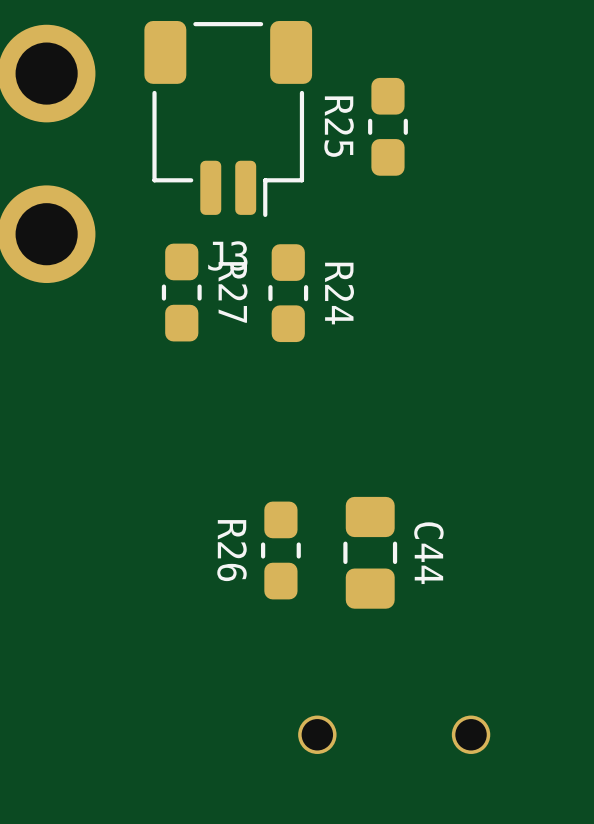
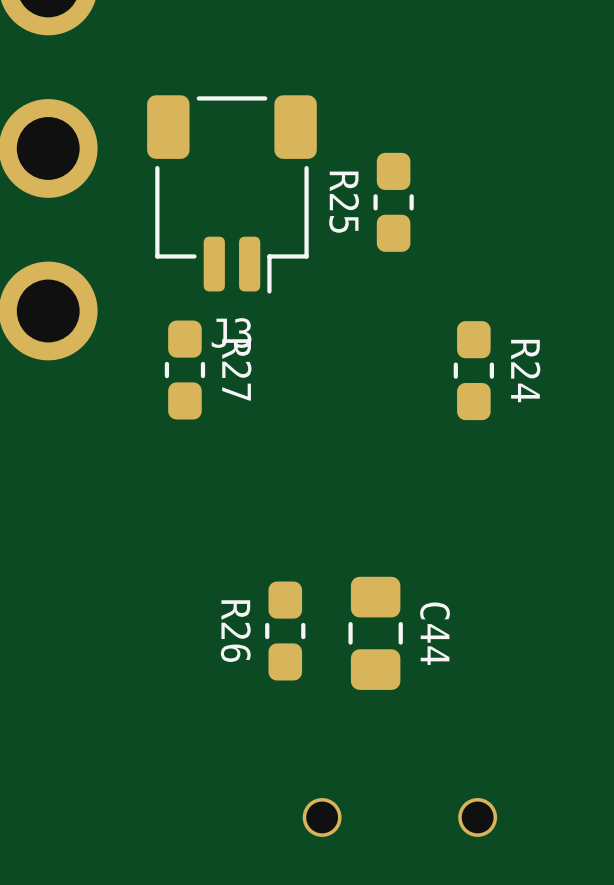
R24 position: (288, 293) -> (473, 370)

